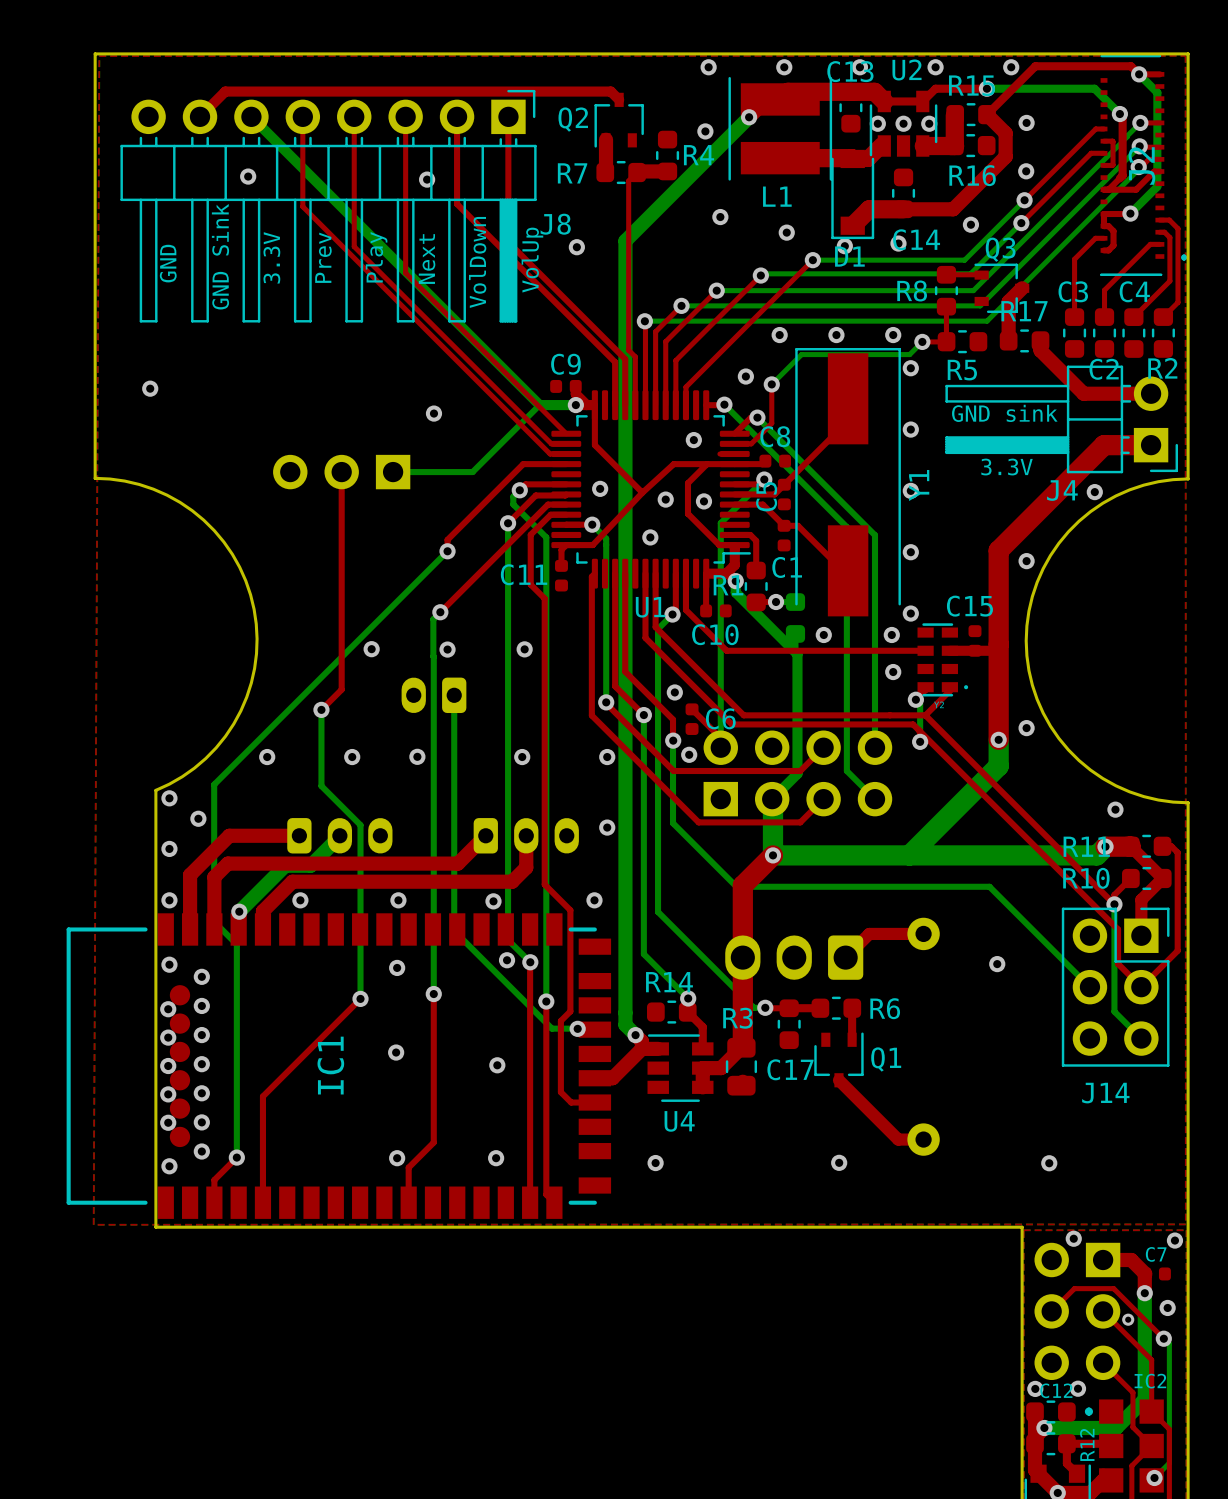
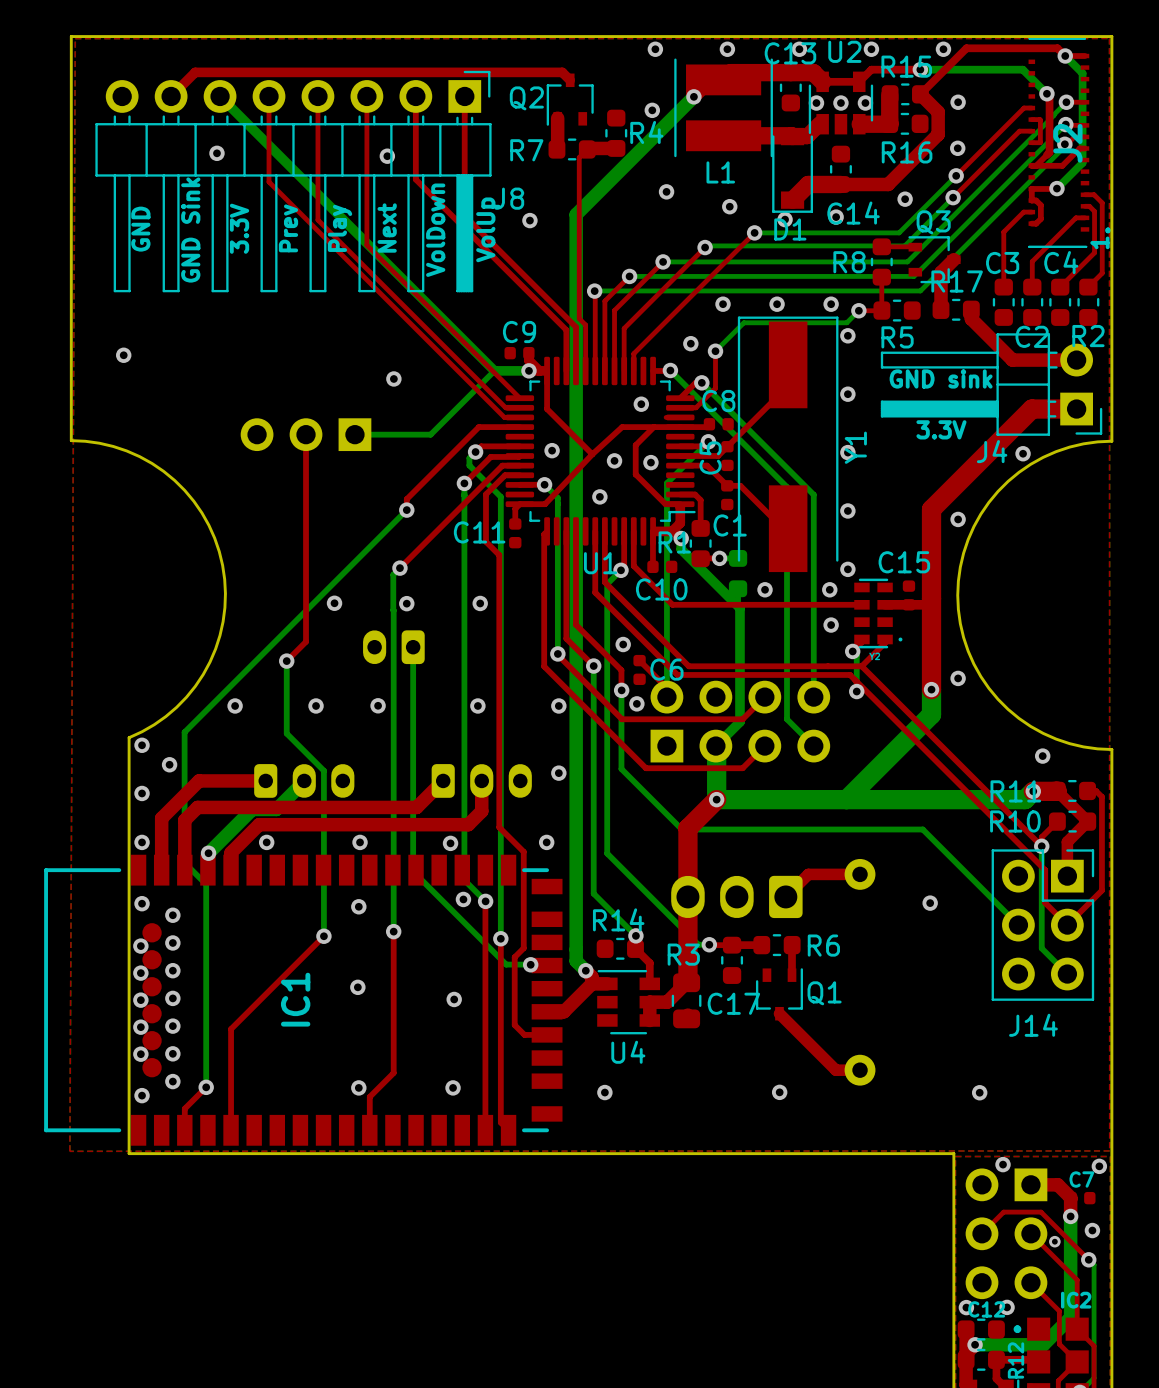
text: none -> 1 (1099, 242)

